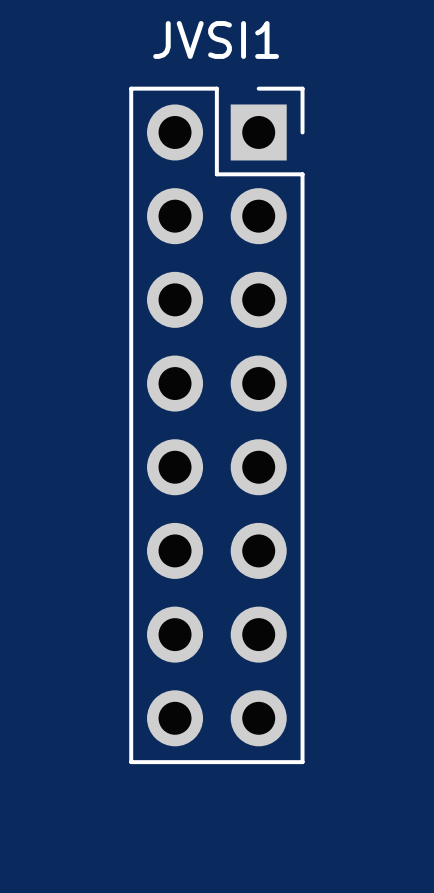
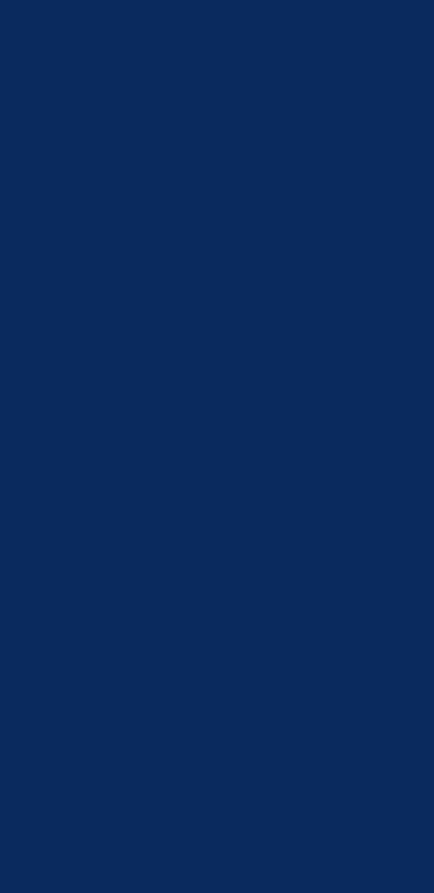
JVSI1: (216, 425) -> none

